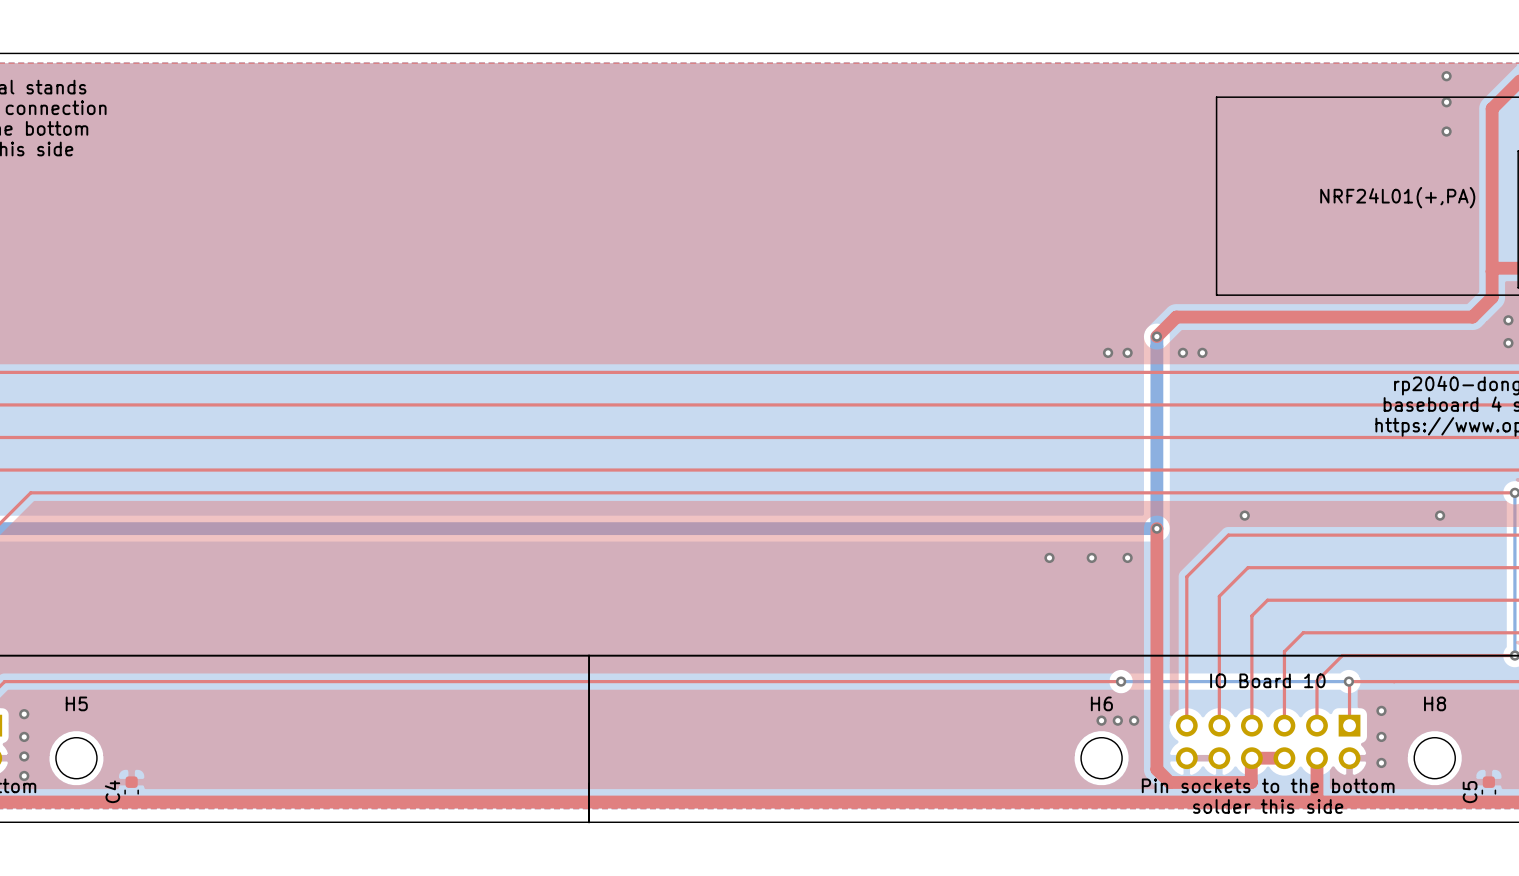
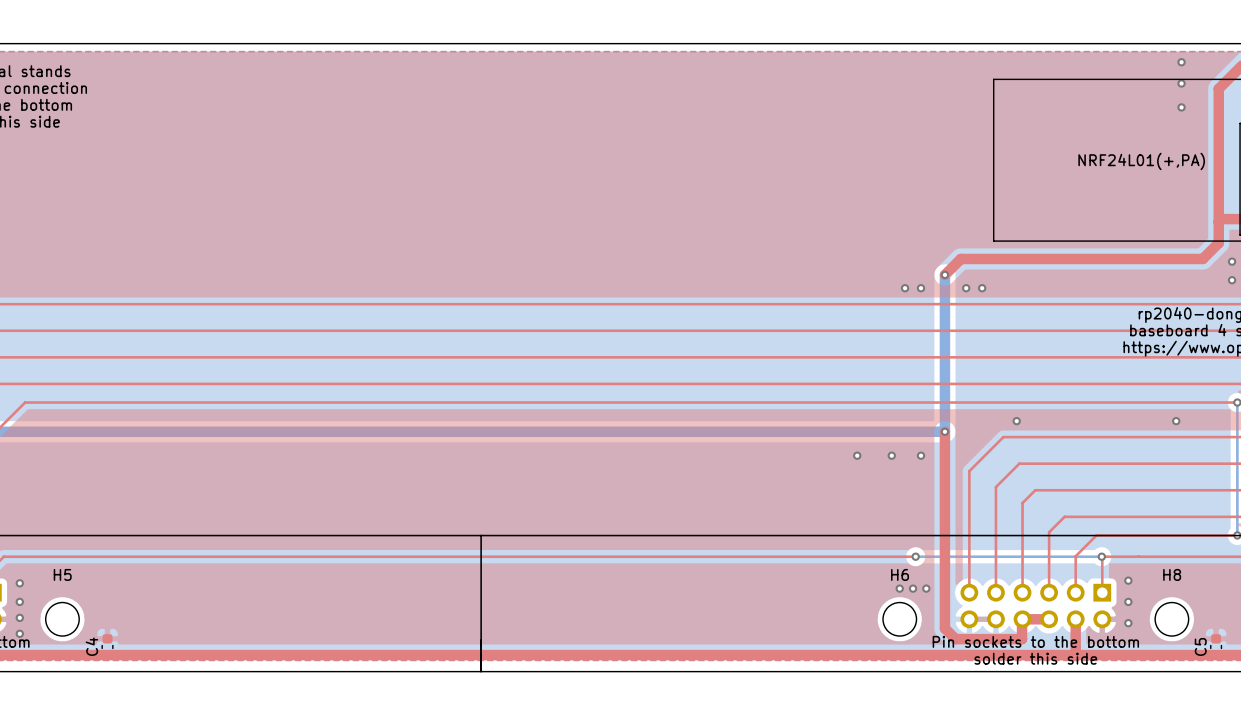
text: IO Board 10 (1267, 680) -> none

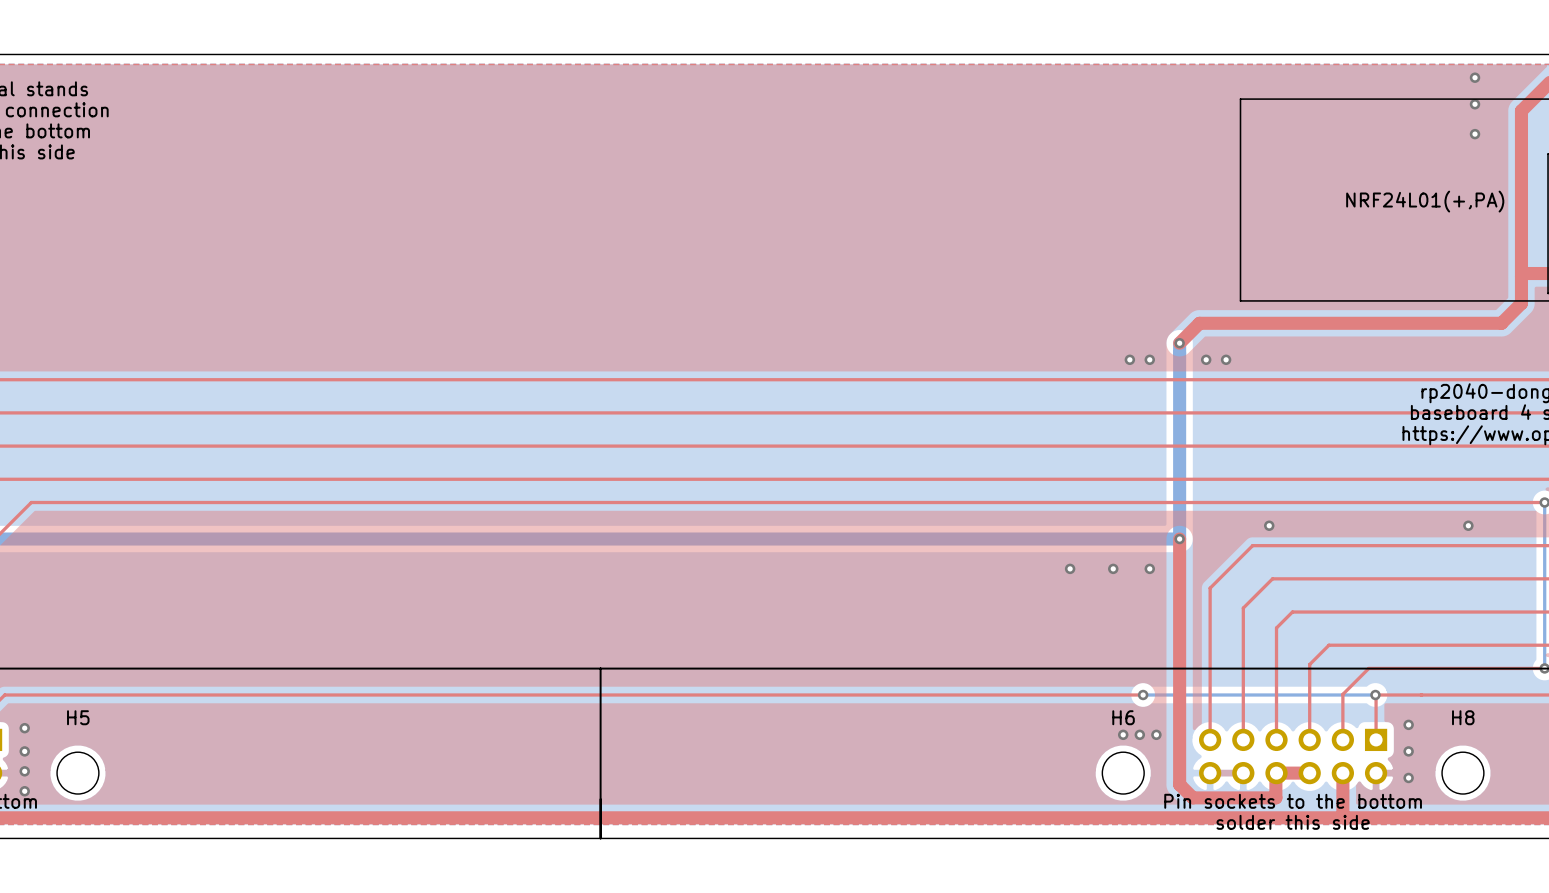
via: (1232, 261) -> none
via: (1232, 280) -> none
C4: (107, 646) -> none
C5: (1216, 646) -> none

